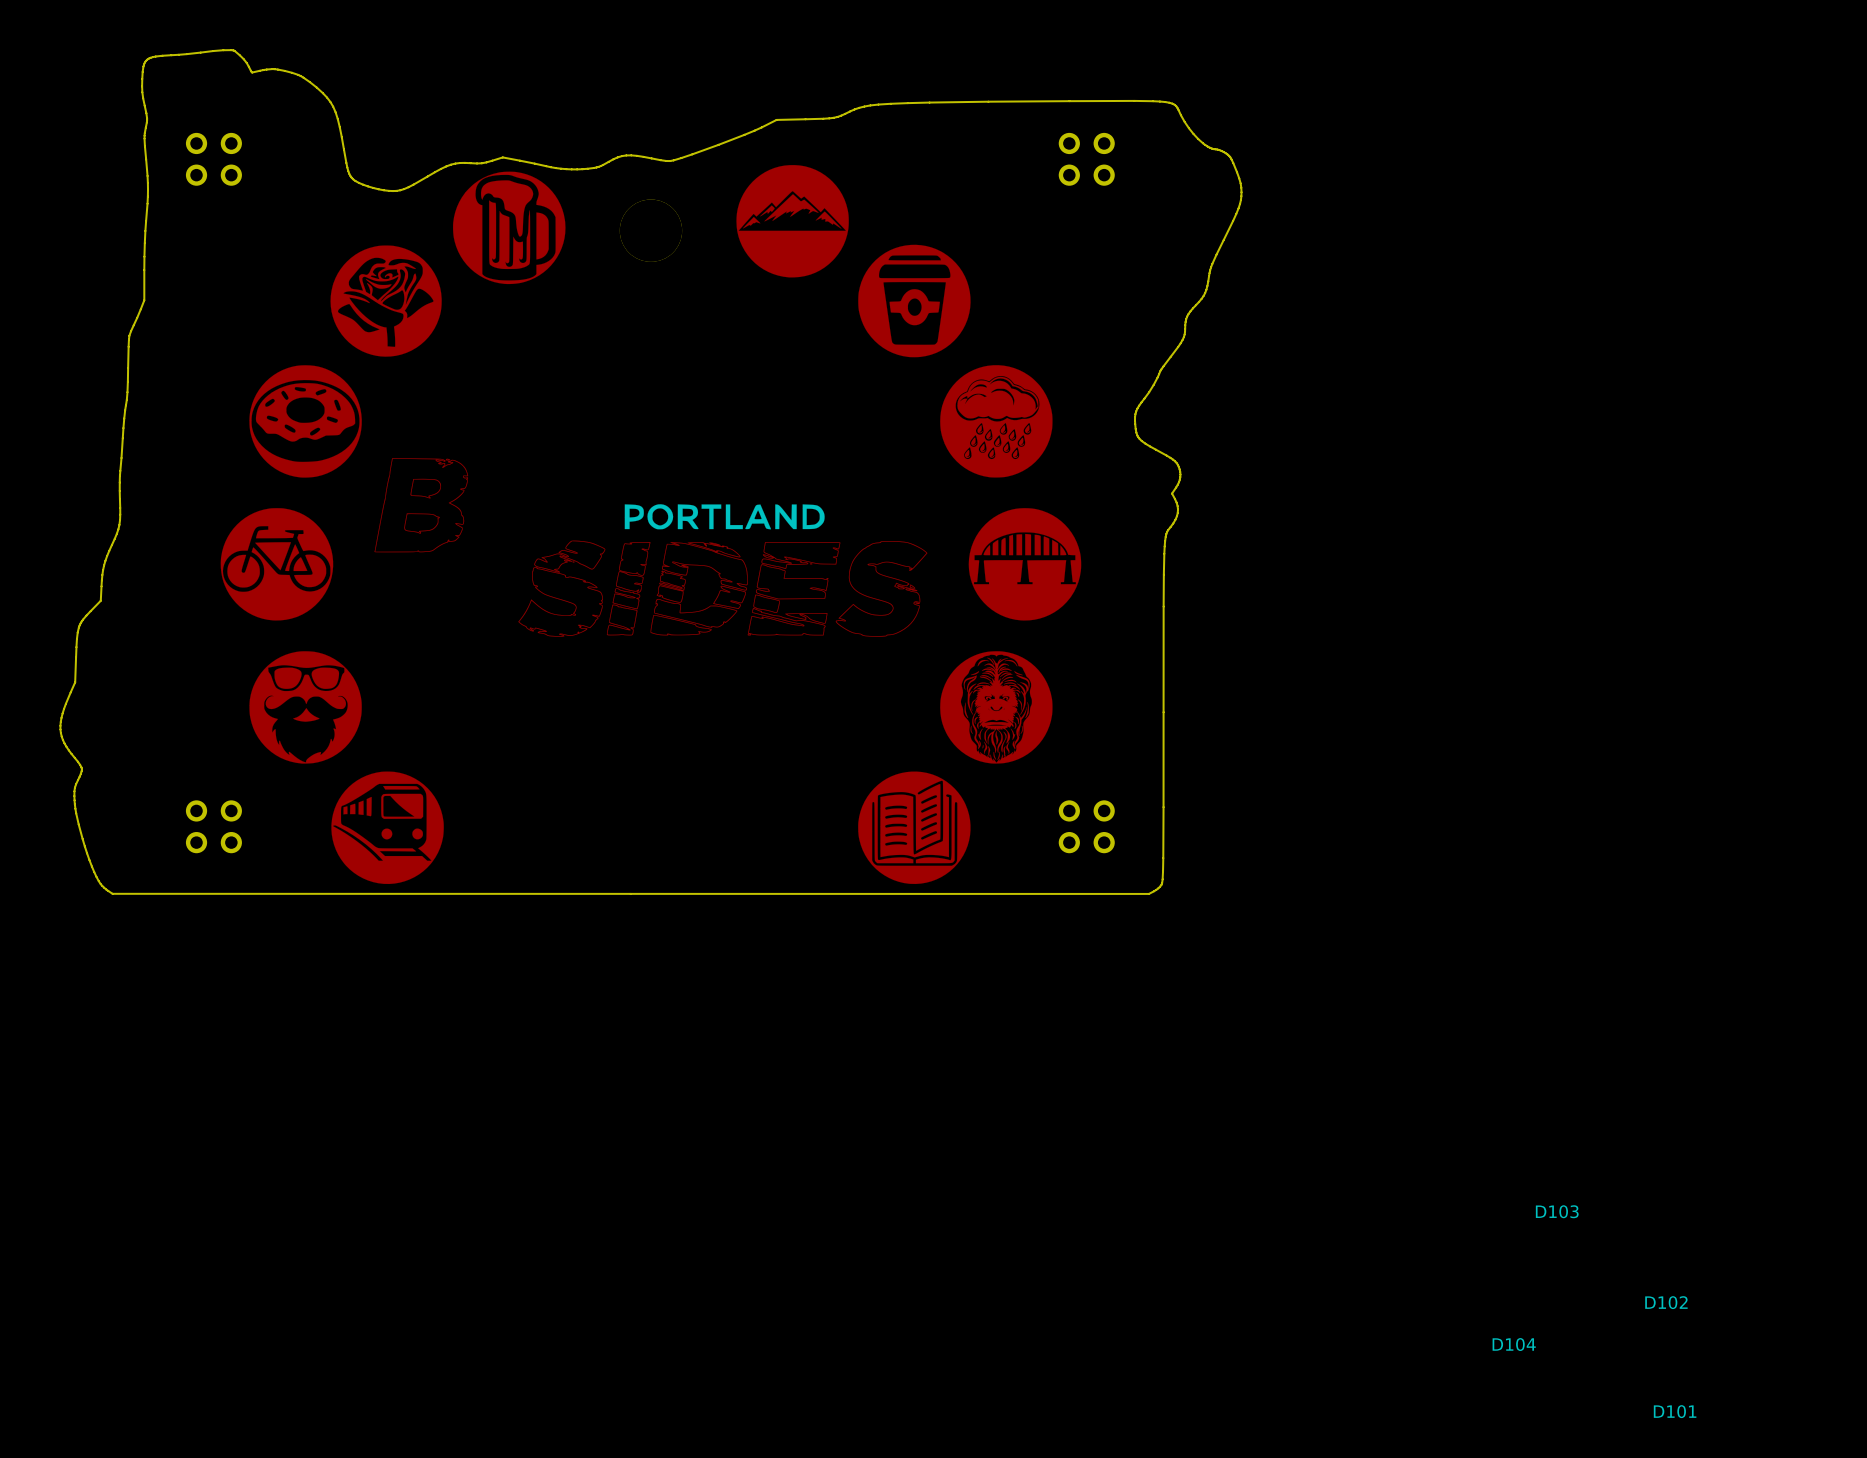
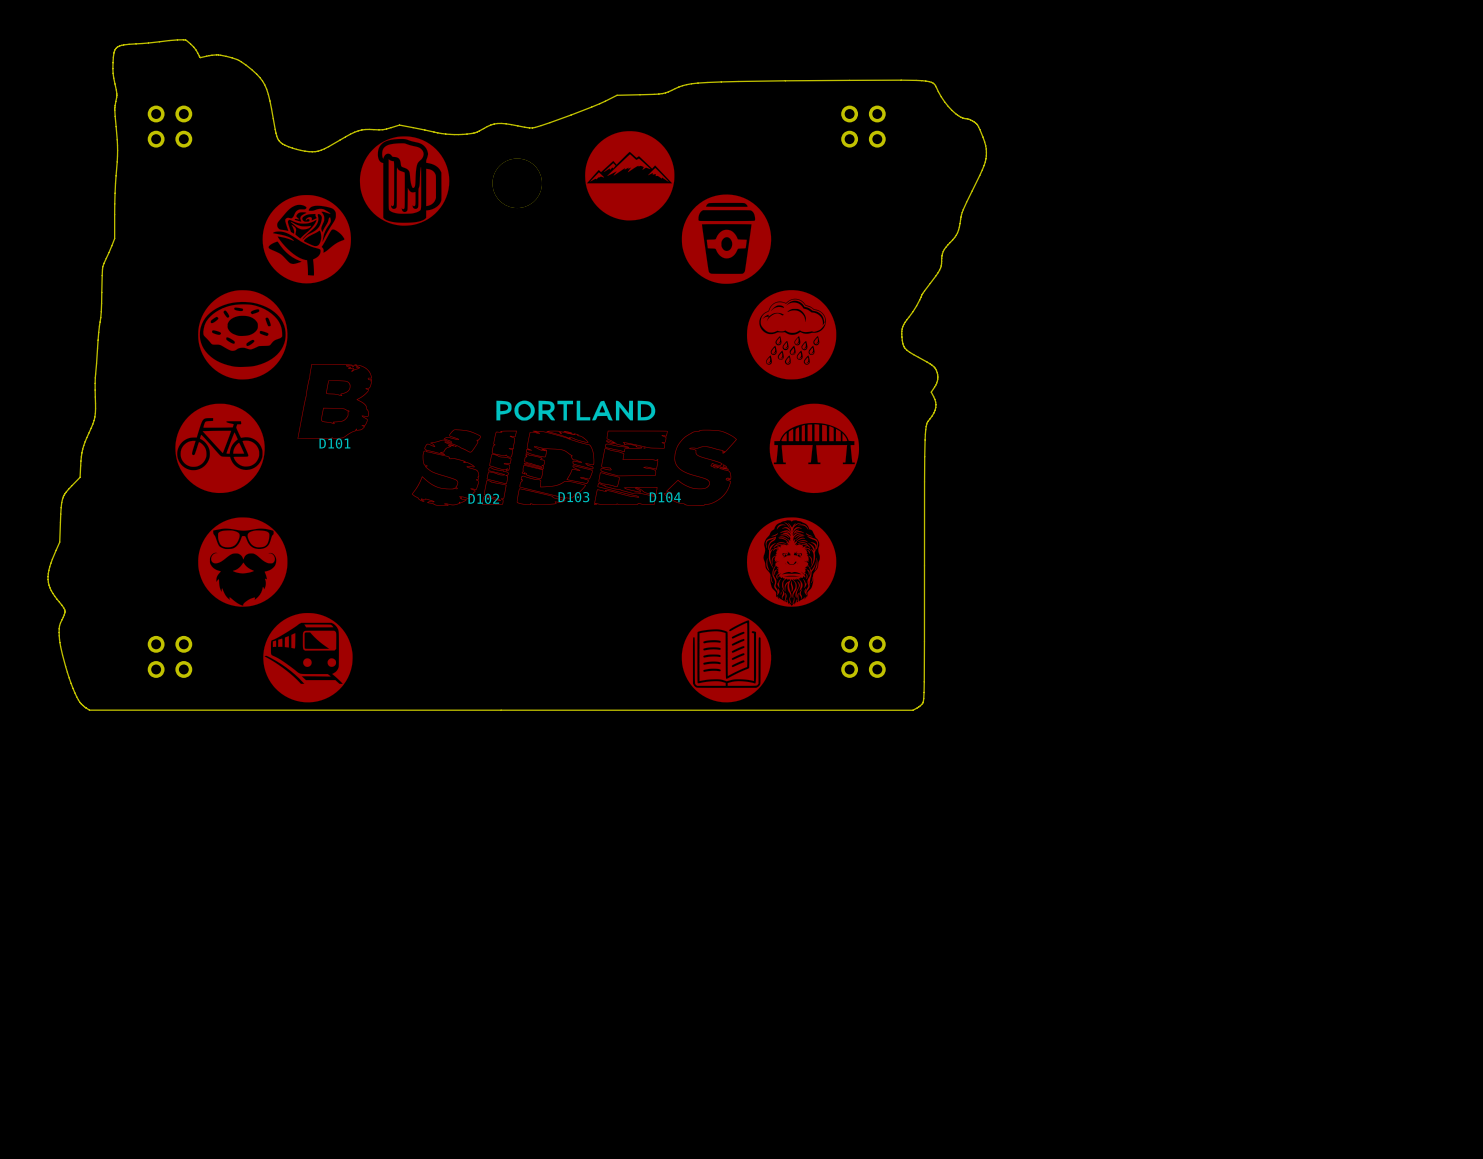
D103 position: (1557, 1211) -> (573, 497)
D102 position: (1666, 1302) -> (483, 498)
D104 position: (1514, 1344) -> (665, 497)
D101 position: (1675, 1411) -> (334, 443)

